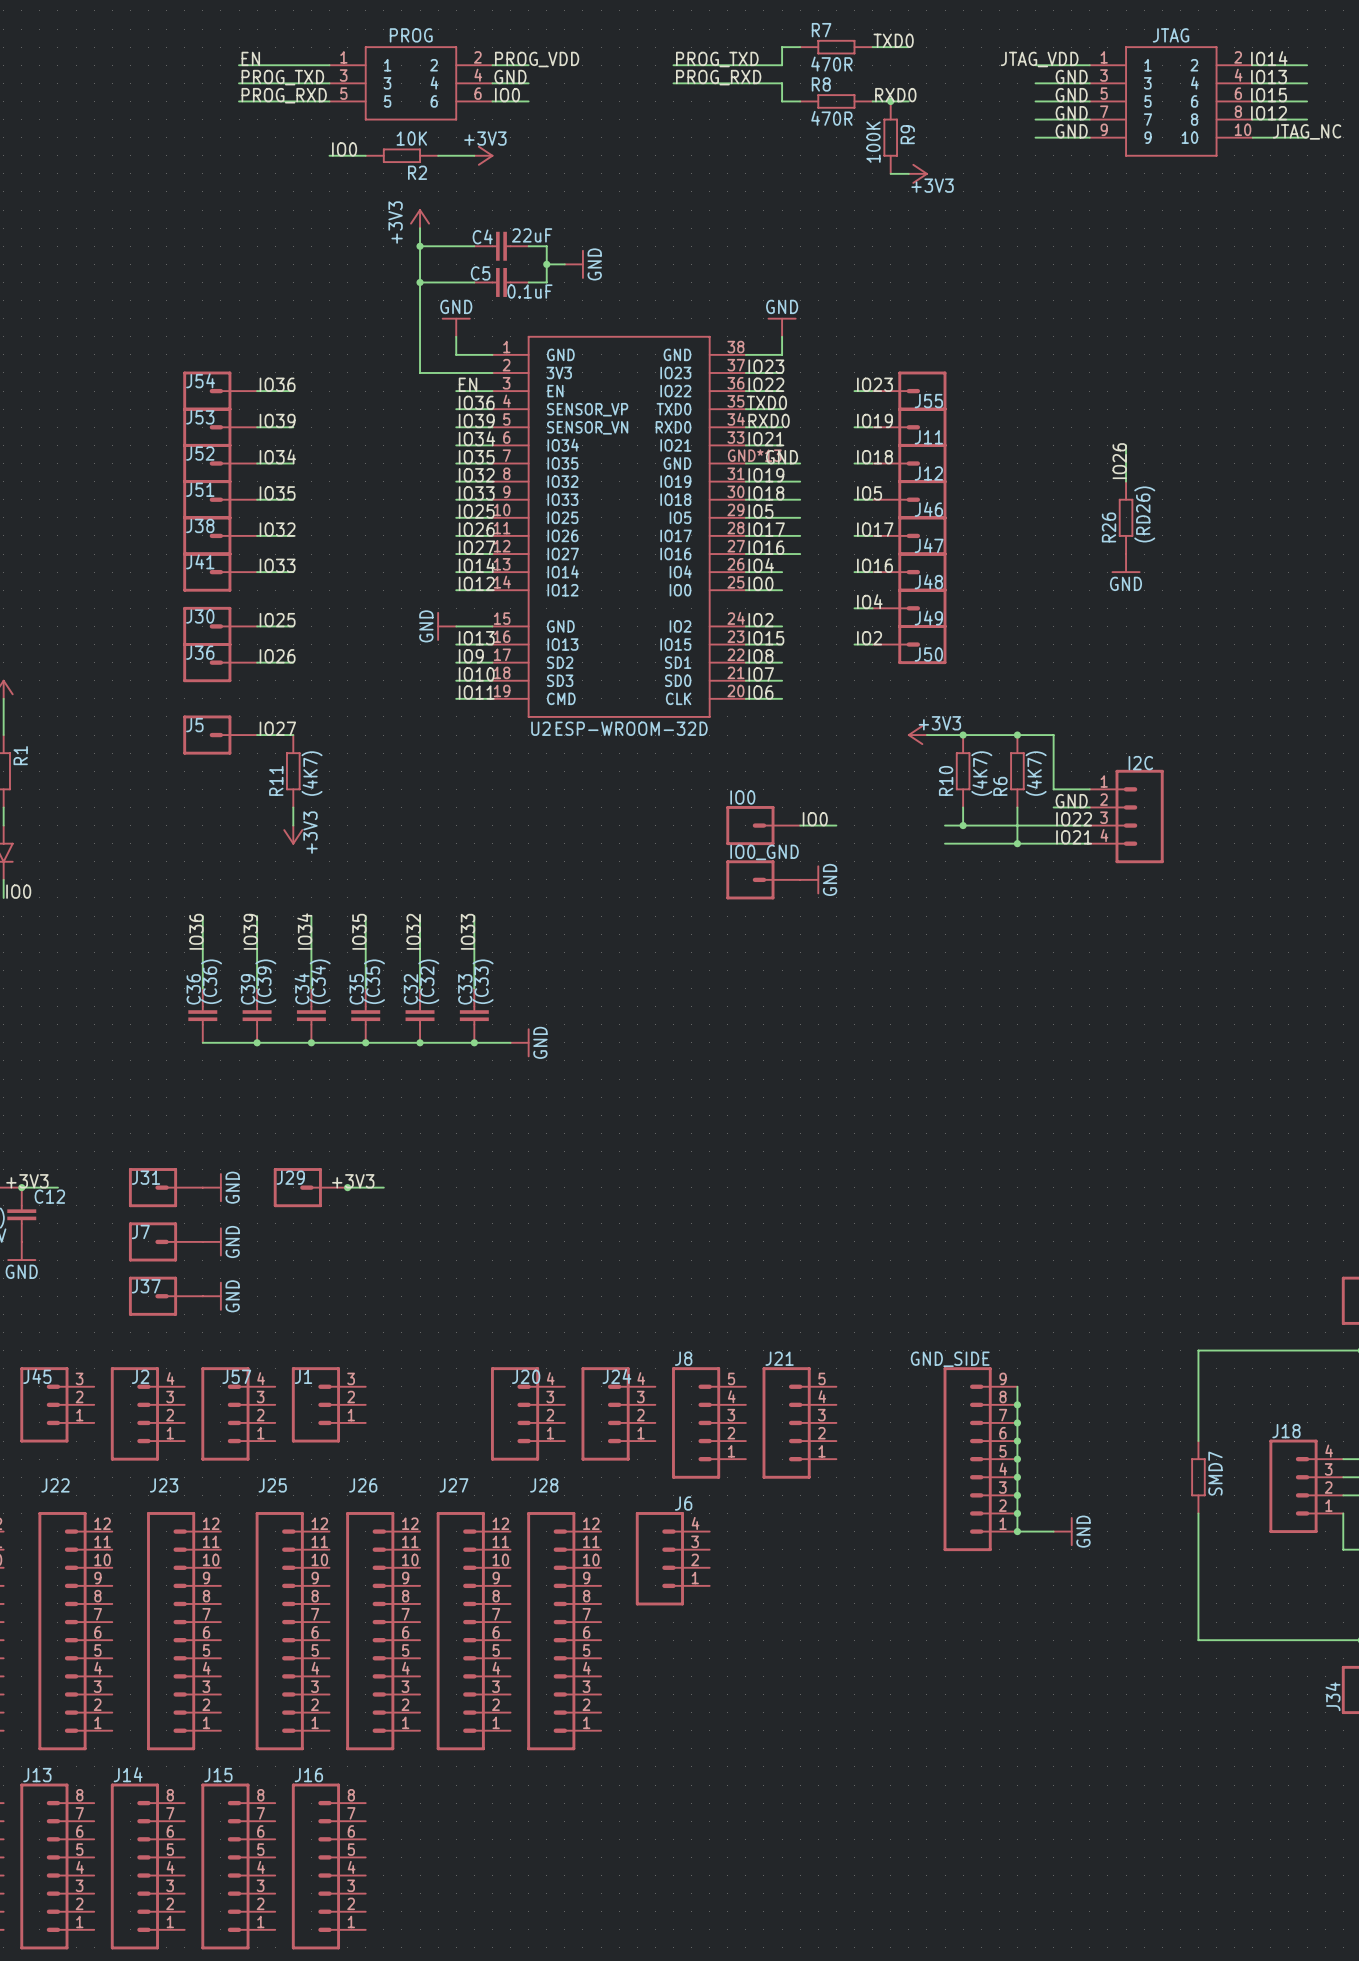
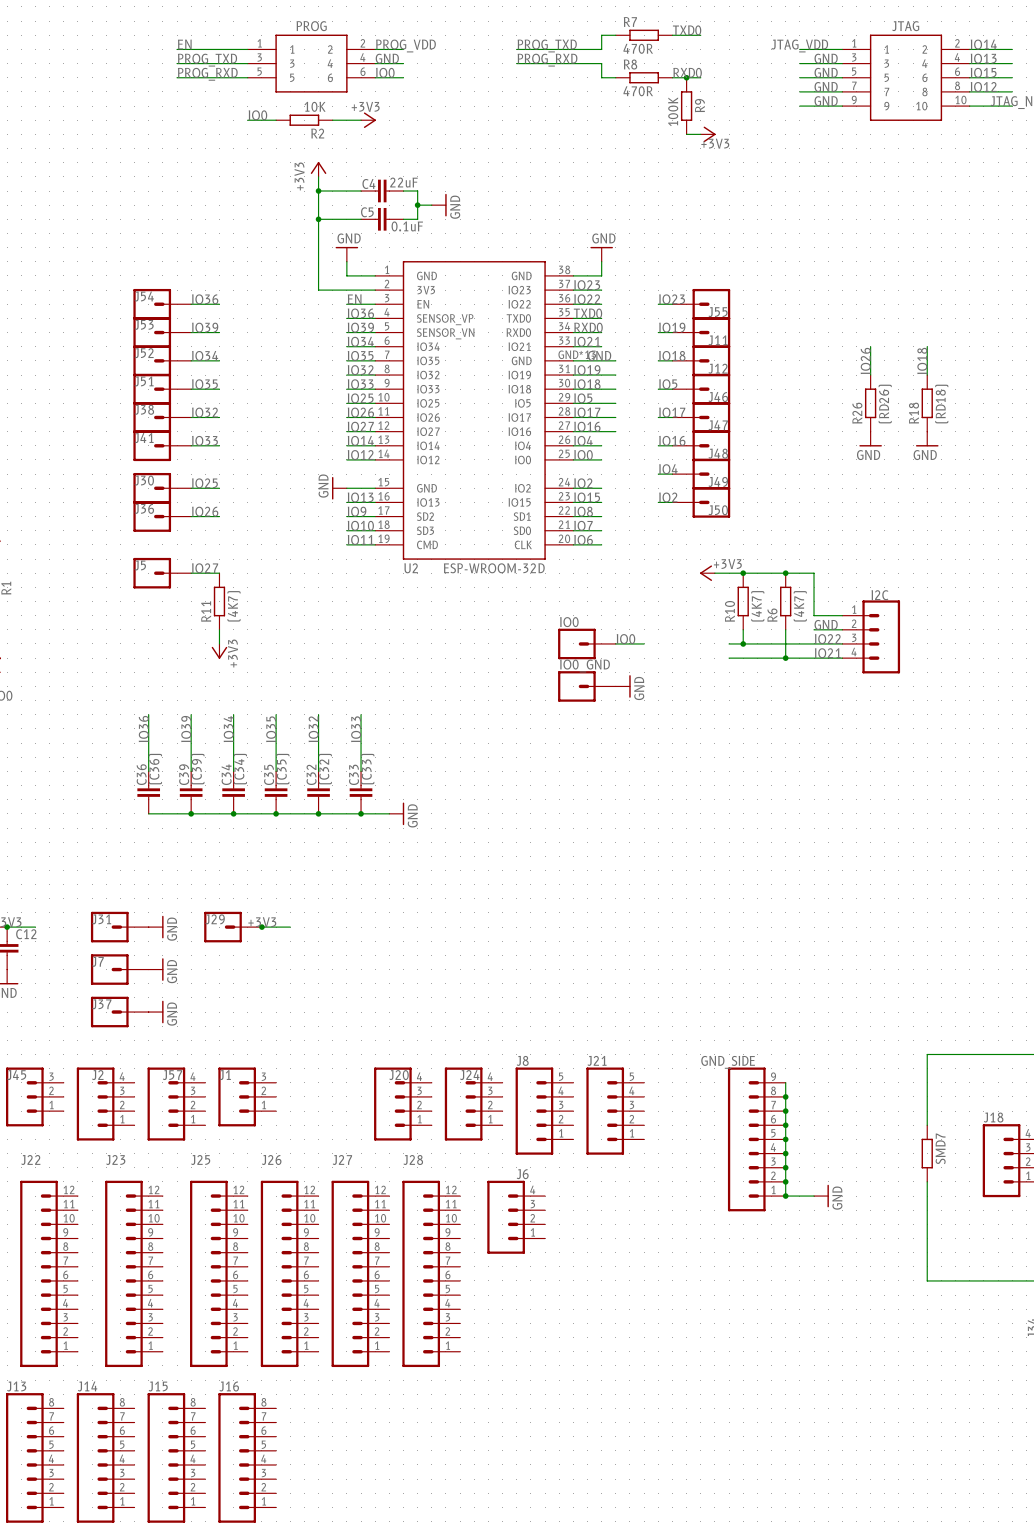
wire: none -> (927, 346) (927, 375)
label: none -> IO18 (922, 360)
R18: none -> (RD18) (927, 403)
power symbol: none -> GND (927, 439)

